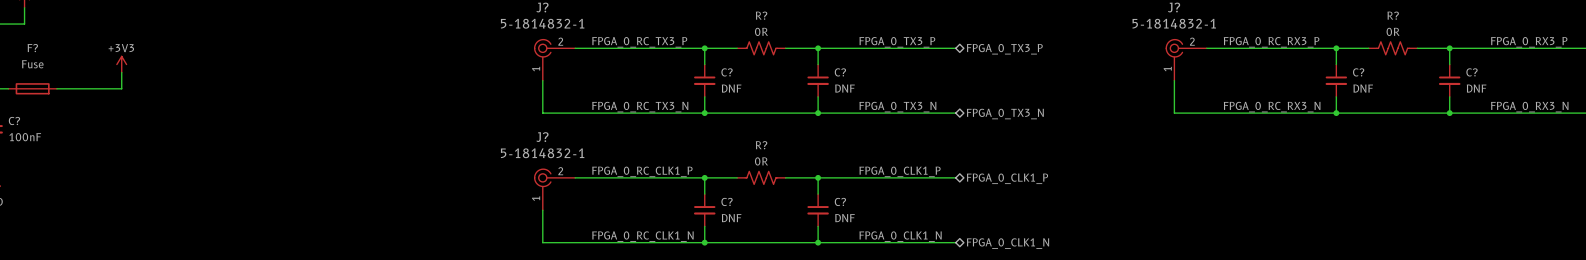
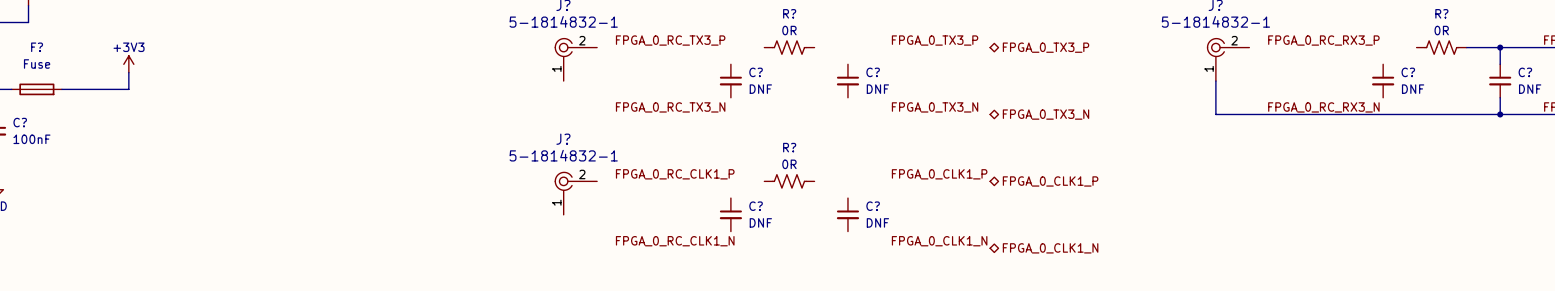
wire: (575, 48) (737, 48) -> none
wire: (704, 48) (704, 64) -> none
junction: (704, 48) -> none
wire: (785, 48) (955, 48) -> none
wire: (818, 48) (818, 64) -> none
junction: (818, 48) -> none
wire: (1206, 48) (1368, 48) -> none
wire: (1336, 48) (1336, 64) -> none
junction: (1336, 48) -> none
wire: (542, 80) (542, 113) (955, 113) -> none
wire: (704, 96) (704, 113) -> none
wire: (818, 96) (818, 113) -> none
wire: (1336, 96) (1336, 113) -> none
junction: (704, 113) -> none
junction: (818, 113) -> none
junction: (1336, 113) -> none
wire: (575, 177) (737, 177) -> none
wire: (704, 177) (704, 194) -> none
junction: (704, 177) -> none
wire: (785, 177) (955, 177) -> none
wire: (818, 177) (818, 194) -> none
junction: (818, 177) -> none
wire: (542, 210) (542, 242) (955, 242) -> none
wire: (704, 226) (704, 242) -> none
wire: (818, 226) (818, 242) -> none
junction: (704, 242) -> none
junction: (818, 242) -> none

